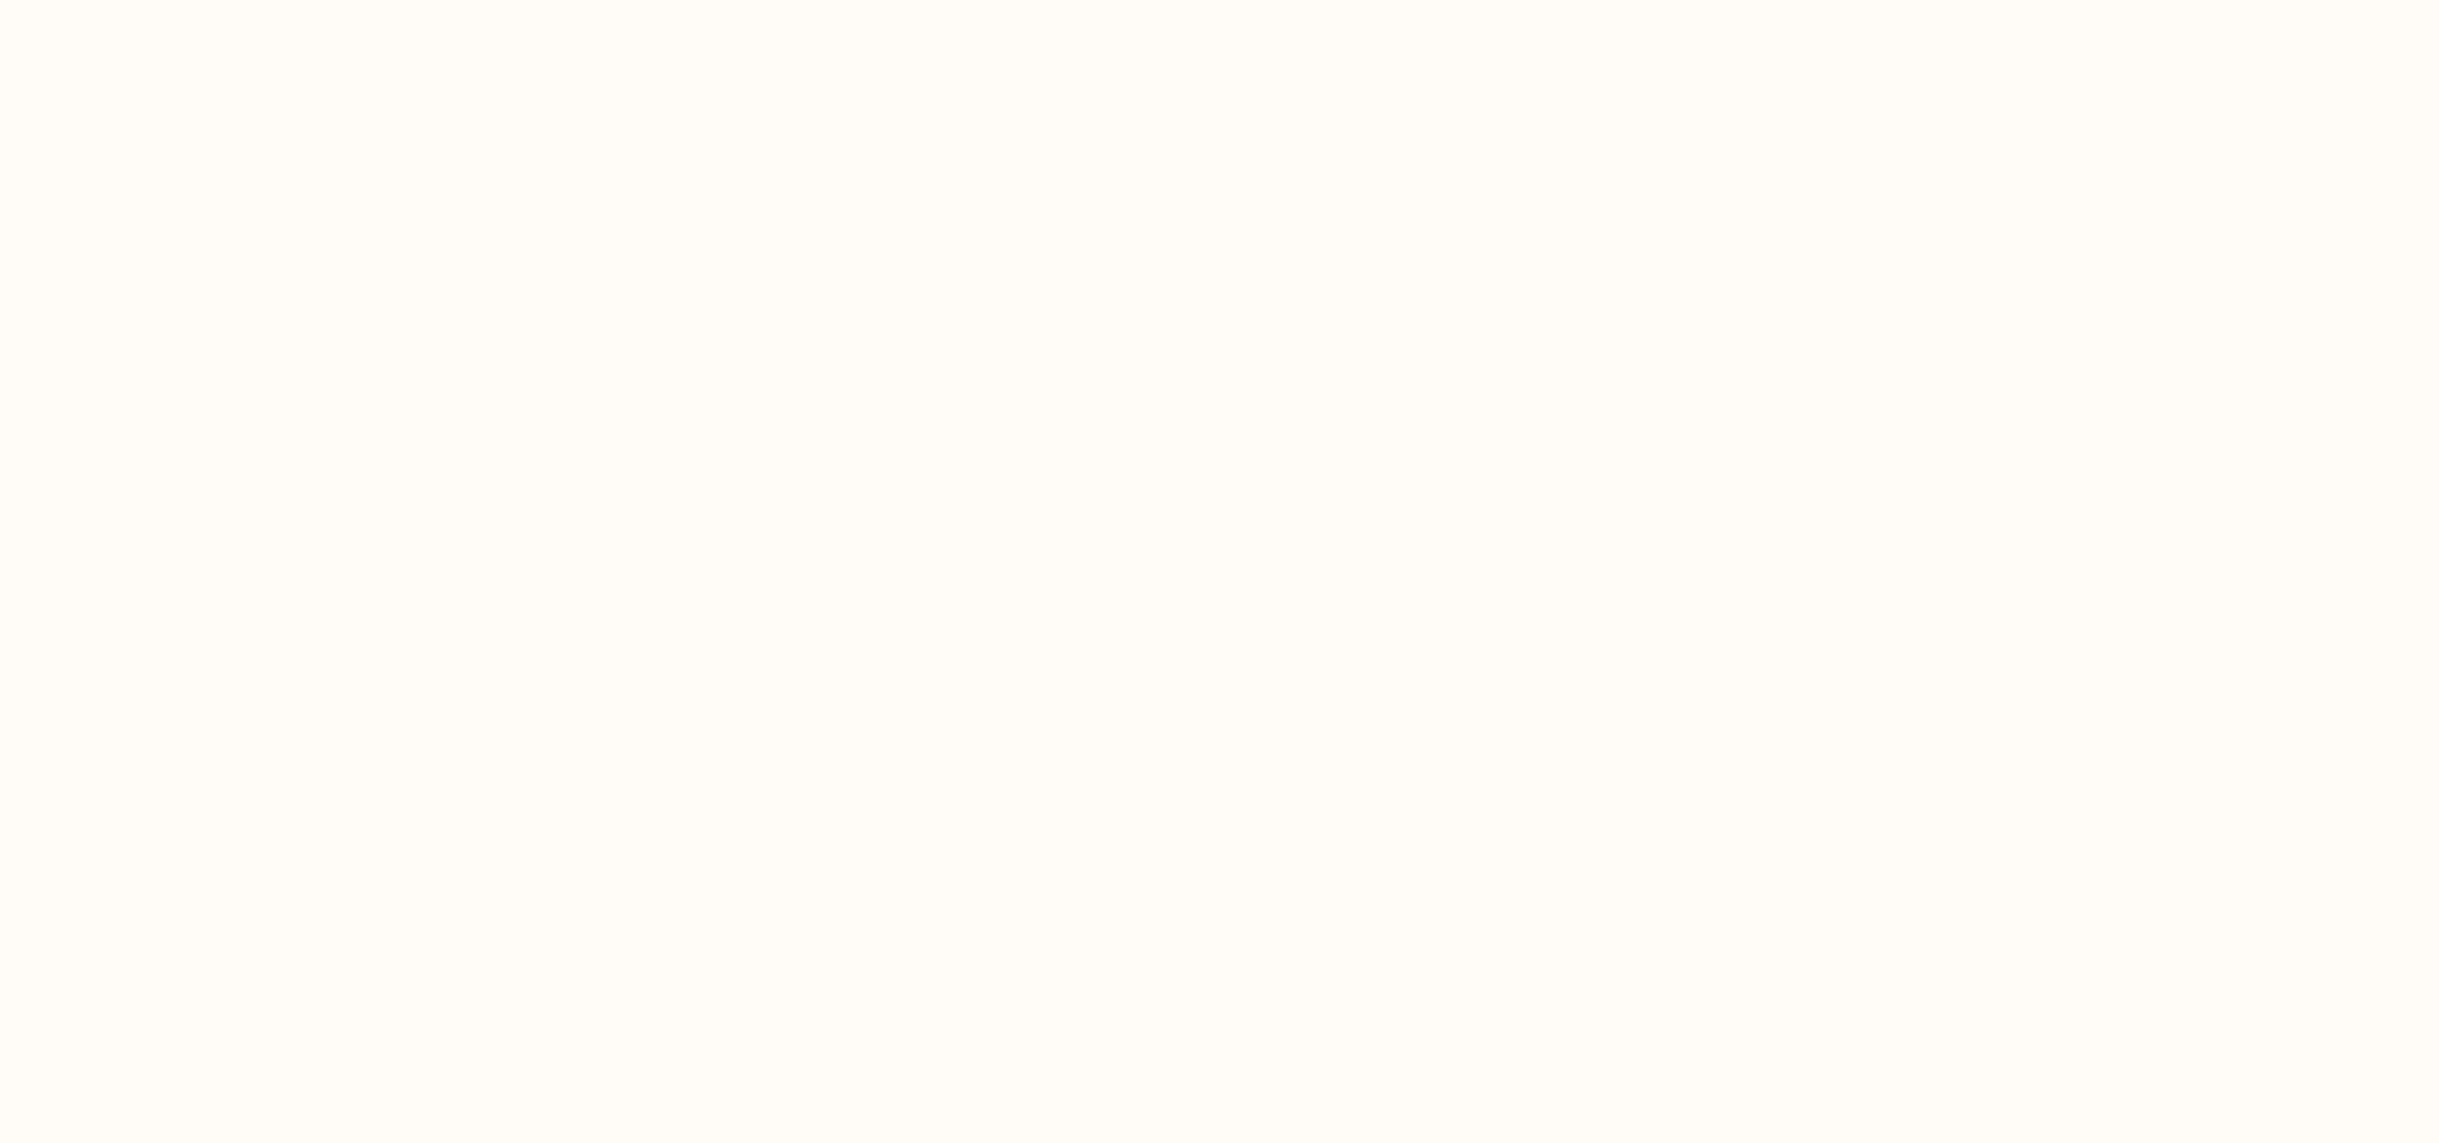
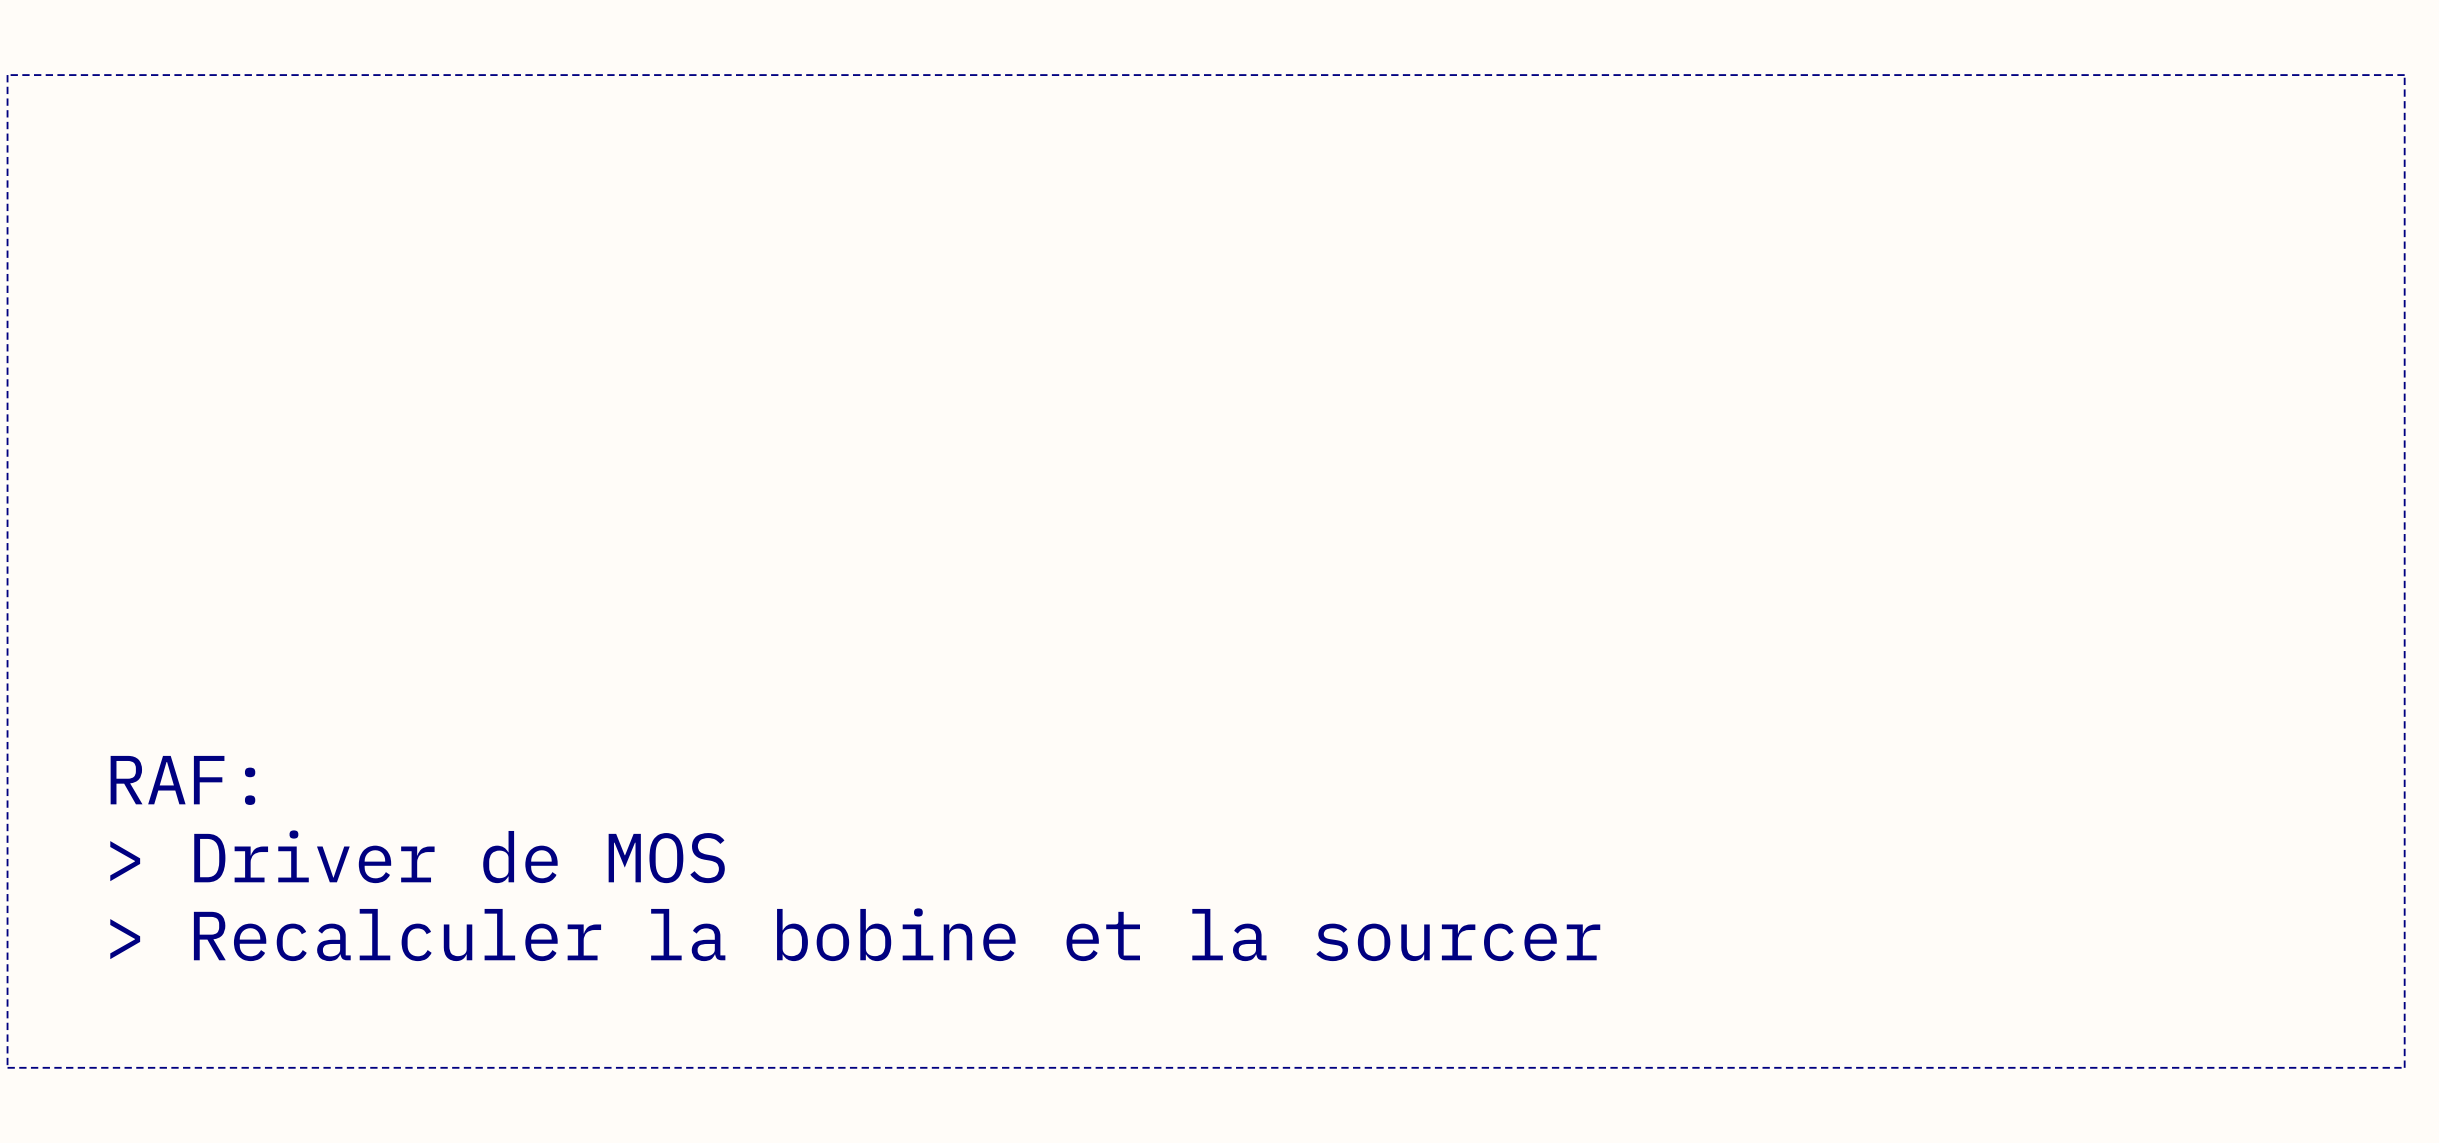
line: none -> (7, 75) (7, 1067) (2404, 1067) (2404, 75) (7, 75)
text: none -> RAF: (182, 780)
text: none -> > Driver de MOS (417, 856)
text: none -> > Recalculer la bobine et la sourcer (855, 934)

